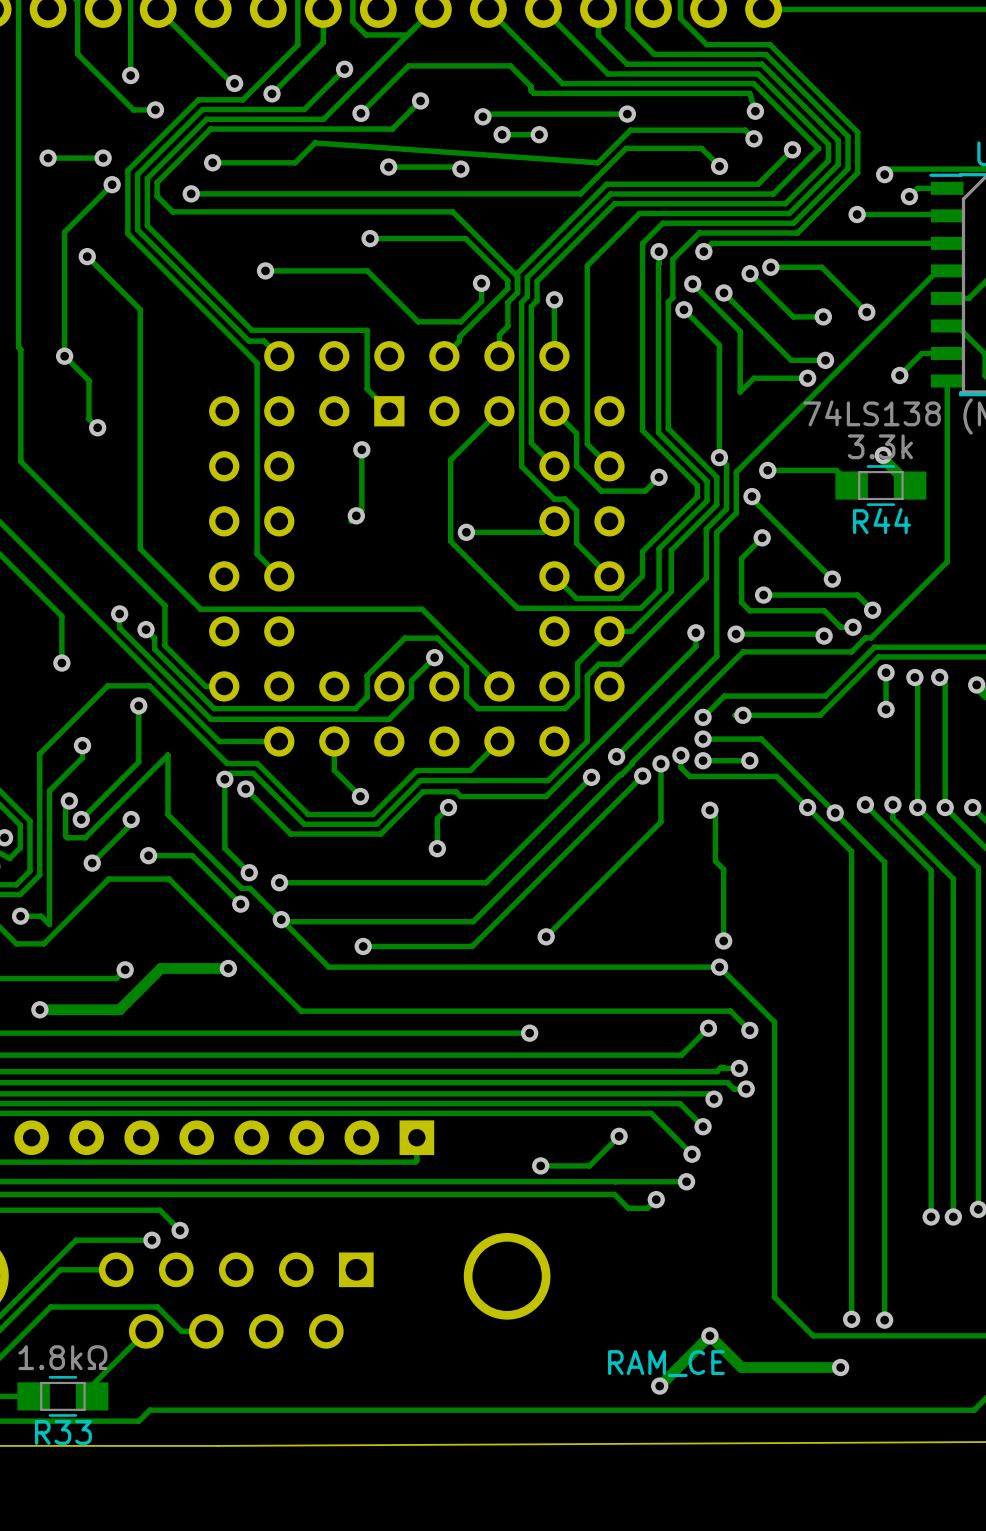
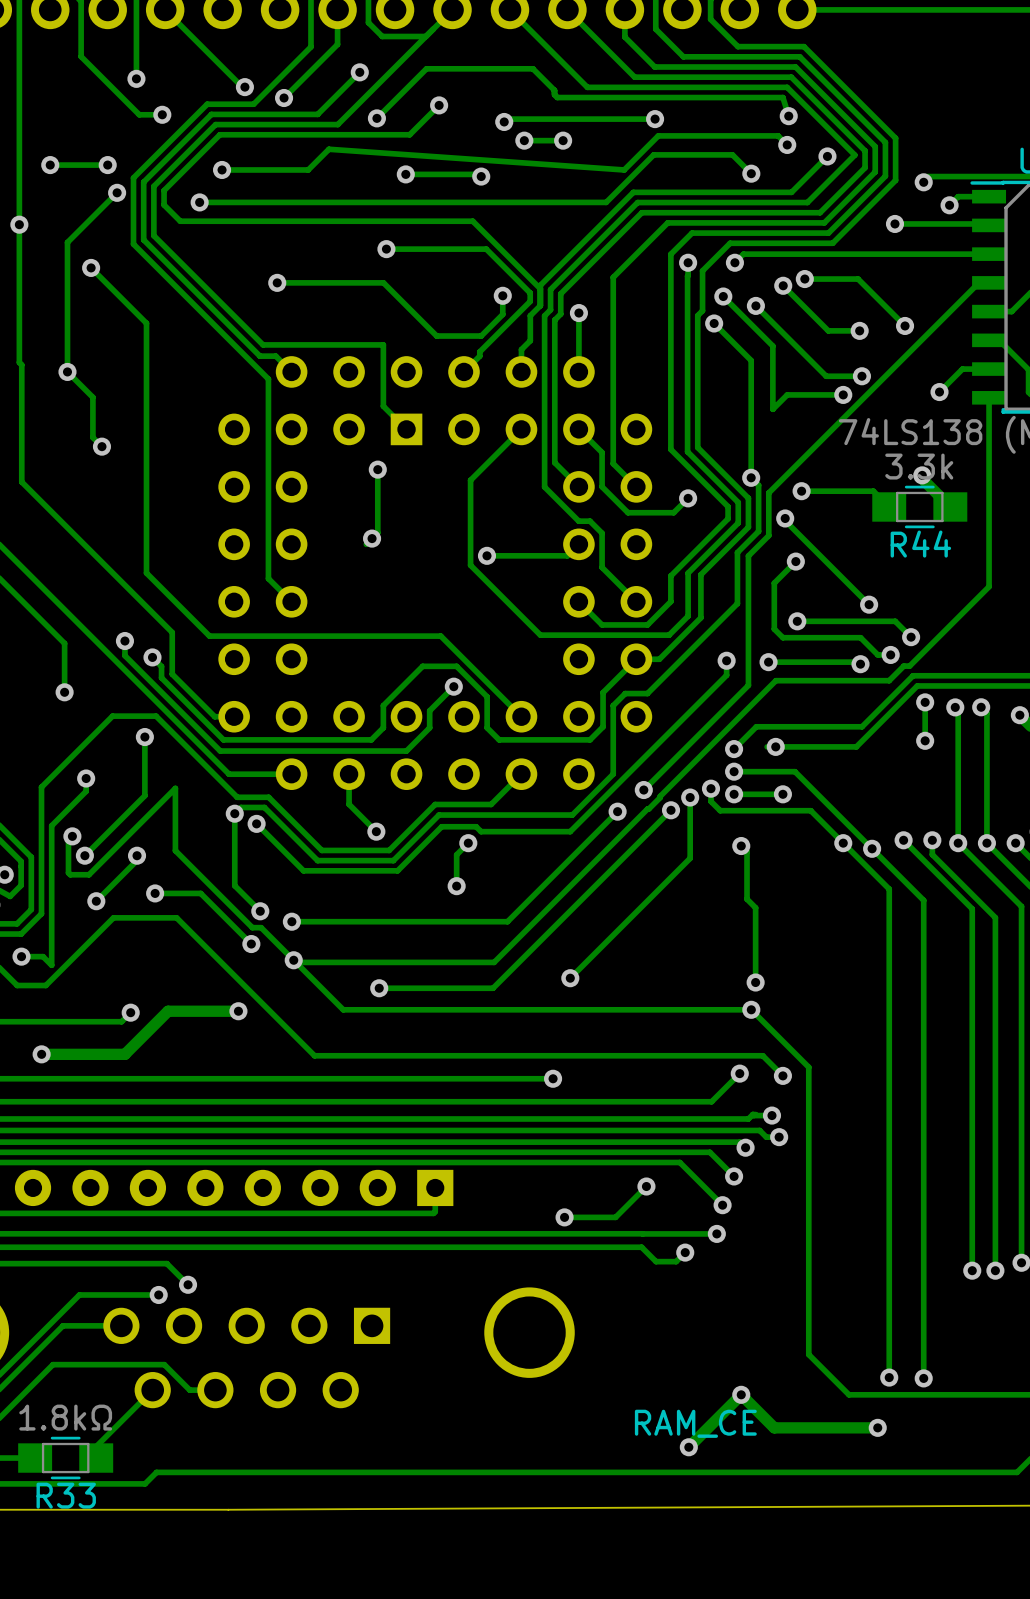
via: none -> (19, 224)

